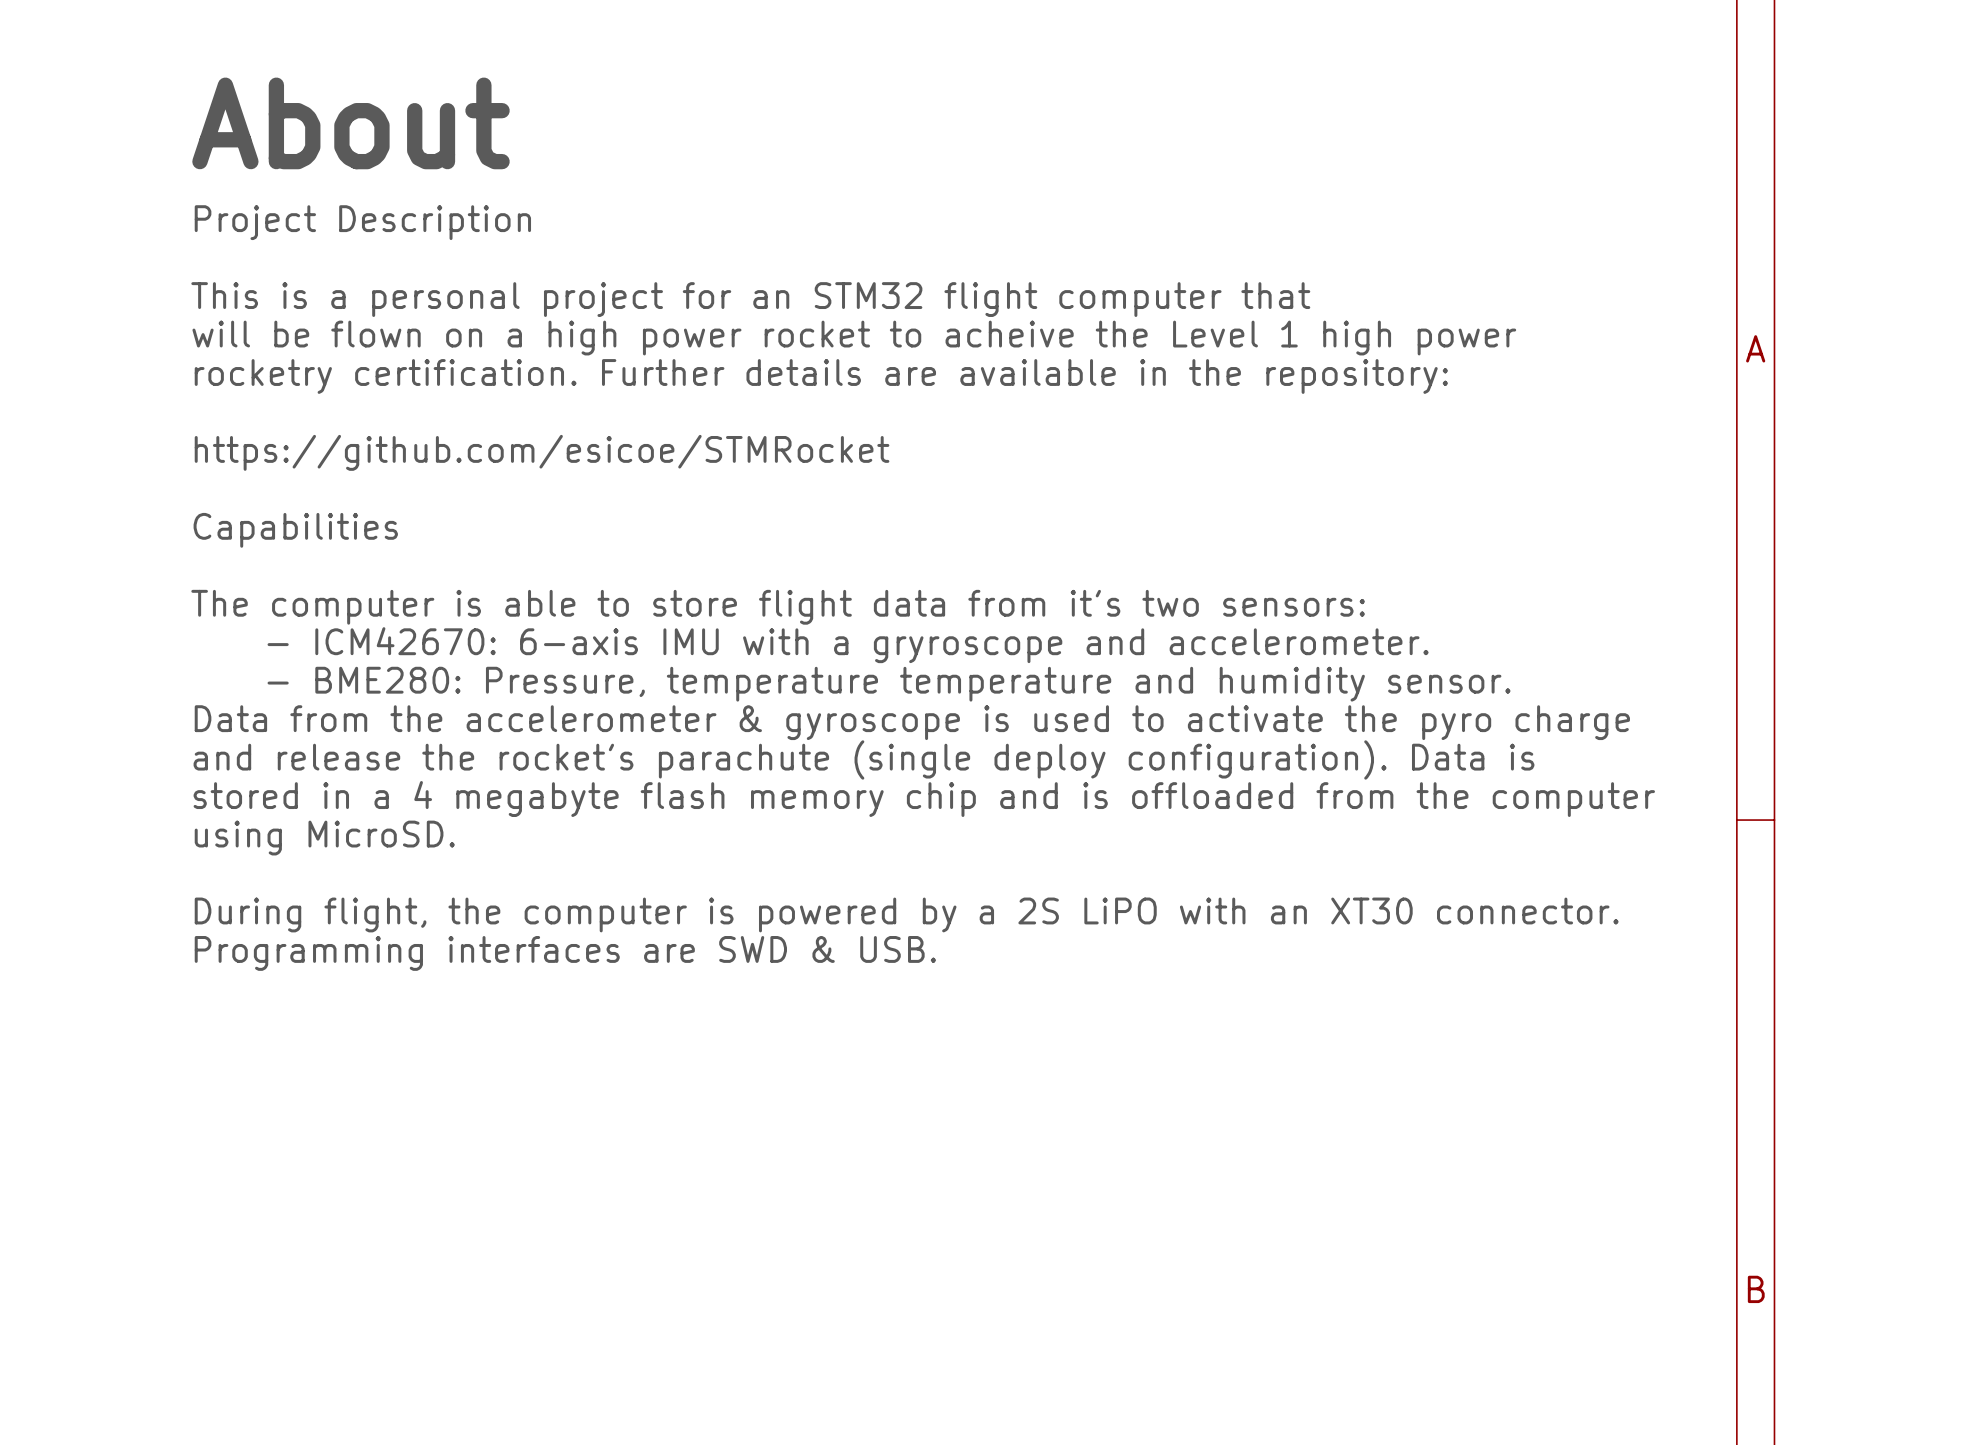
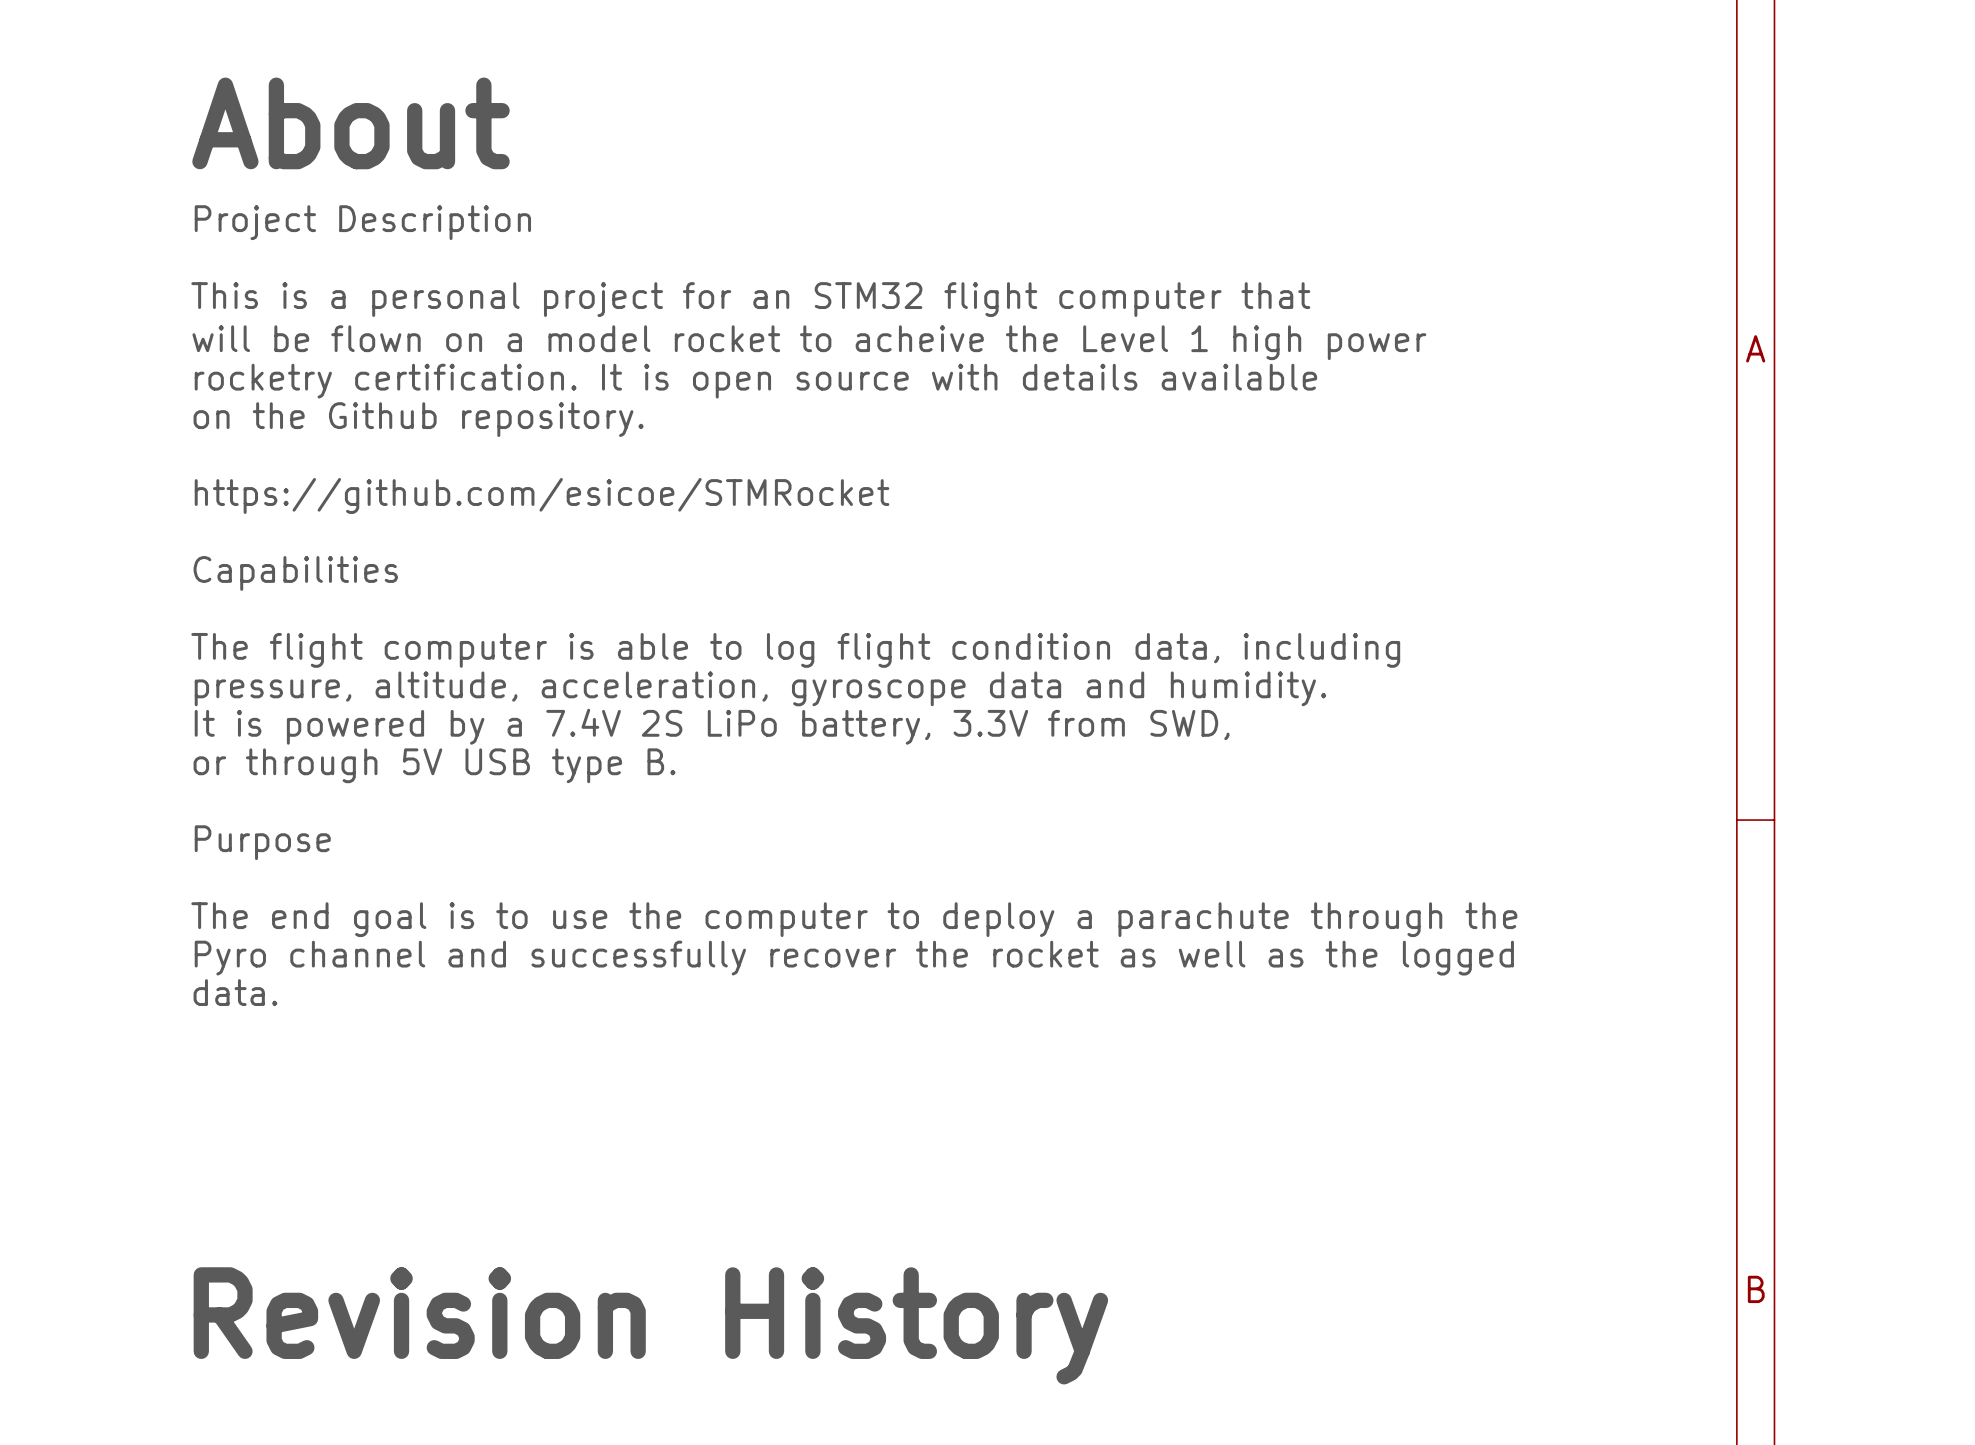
text: will be flown on a high power rocket to acheive the Level 1 high power (854, 338) -> will be flown on a model rocket to acheive the Level 1 high power (809, 342)
text: rocketry certification. Further details are available in the repository: (821, 376) -> rocketry certification. It is open source with details available (755, 381)
text: none -> on the Github repository. (418, 419)
text position: https://github.com/esicoe/STMRocket (542, 452) -> https://github.com/esicoe/STMRocket (542, 495)
text position: Capabilities (295, 530) -> Capabilities (295, 573)
text: The computer is able to store flight data from it's two sensors: (778, 607) -> none
text: - ICM42670: 6-axis IMU with a gryroscope and accelerometer. (848, 645) -> The flight computer is able to log flight condition data, including (795, 650)
text: - BME280: Pressure, temperature temperature and humidity sensor. (889, 684) -> pressure, altitude, acceleration, gyroscope data and humidity. (760, 688)
text: Data from the accelerometer & gyroscope is used to activate the pyro charge (912, 722) -> It is powered by a 7.4V 2S LiPo battery, 3.3V from SWD, (712, 726)
text: and release the rocket's parachute (single deploy configuration). Data is (863, 759) -> or through 5V USB type B. (434, 765)
text: stored in a 4 megabyte flash memory chip and is offloaded from the computer (924, 799) -> none
text: using MicroSD. (324, 838) -> Purpose (262, 842)
text: During flight, the computer is powered by a 2S LiPO with an XT30 connector. (906, 914) -> The end goal is to use the computer to deploy a parachute through the (854, 919)
text: Programming interfaces are SWD & USB. (565, 953) -> Pyro channel and successfully recover the rocket as well as the logged (854, 958)
text: none -> data. (235, 992)
text: none -> Revision History (650, 1325)

